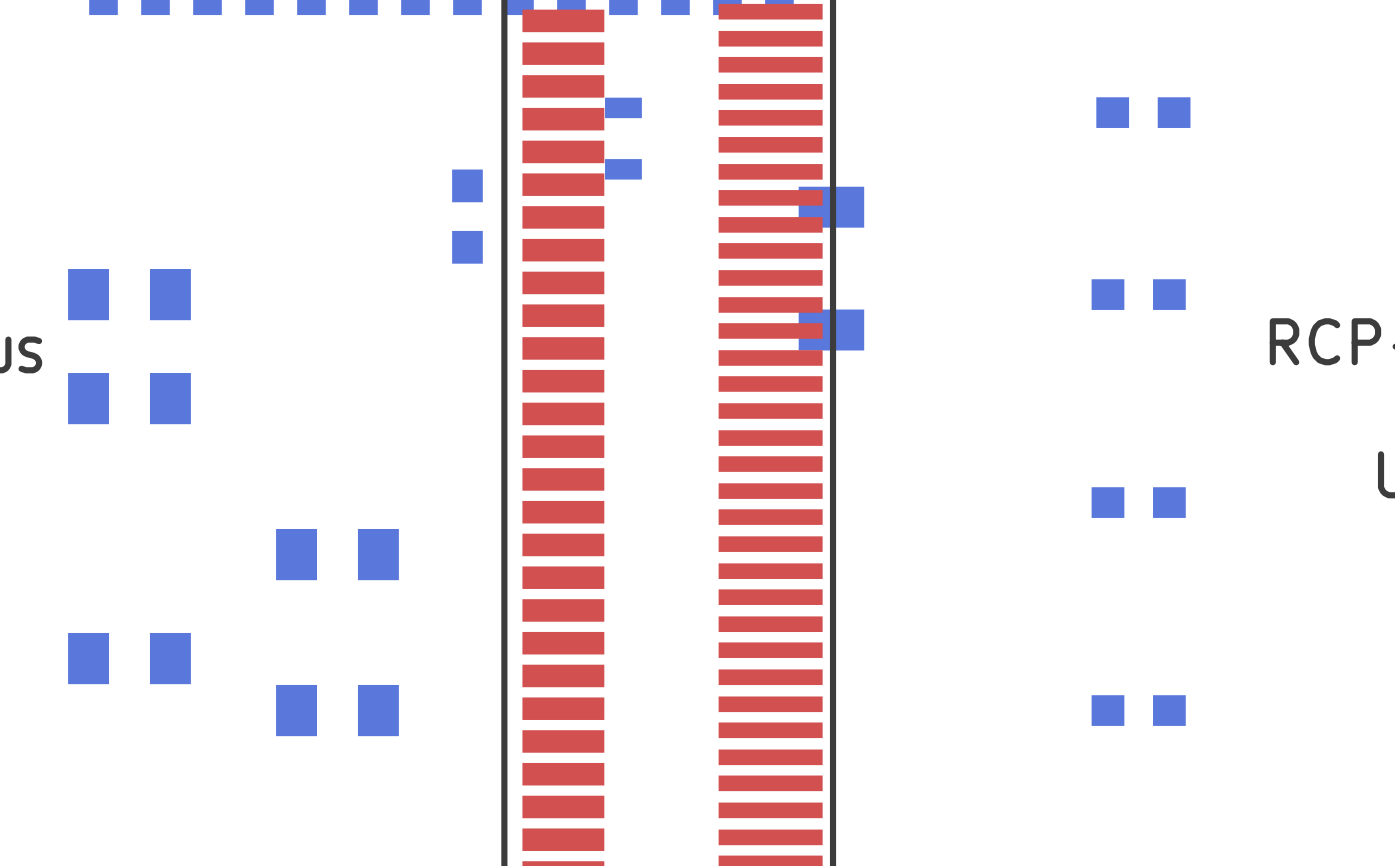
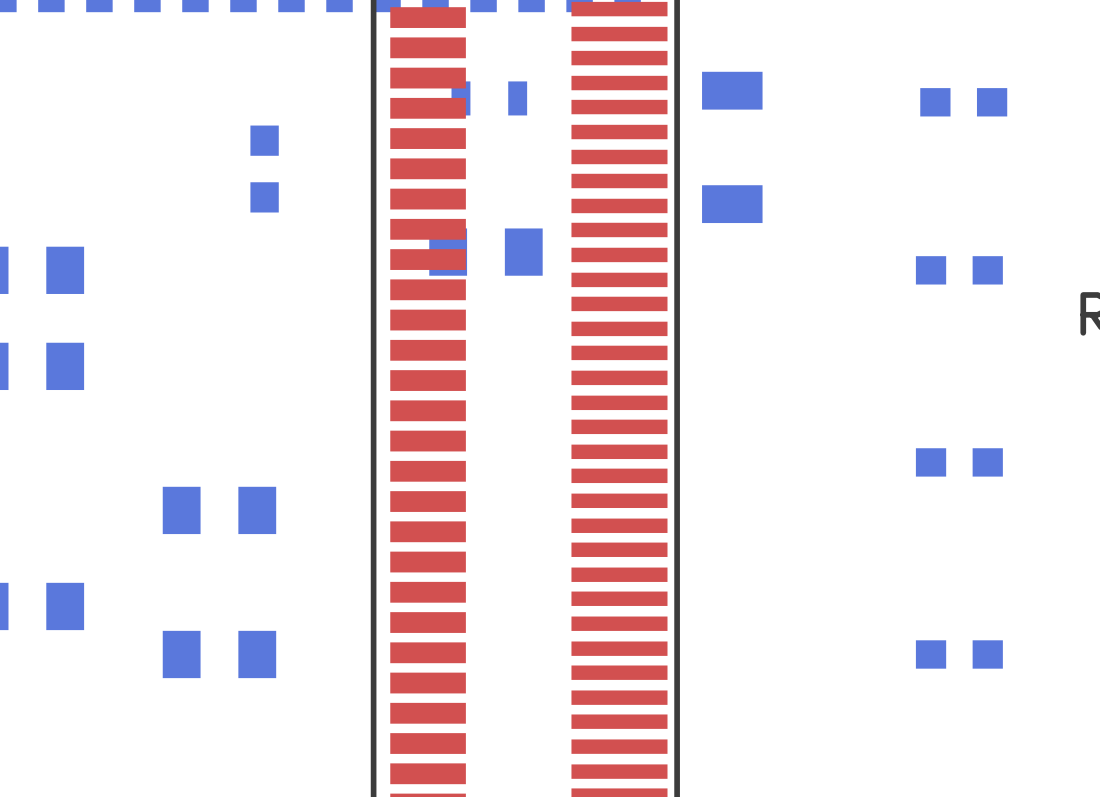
part rotation: 0° (623, 138) -> 90° clockwise (489, 98)
part position: (467, 216) -> (264, 169)
part position: (831, 268) -> (732, 147)
part: none -> (485, 252)

